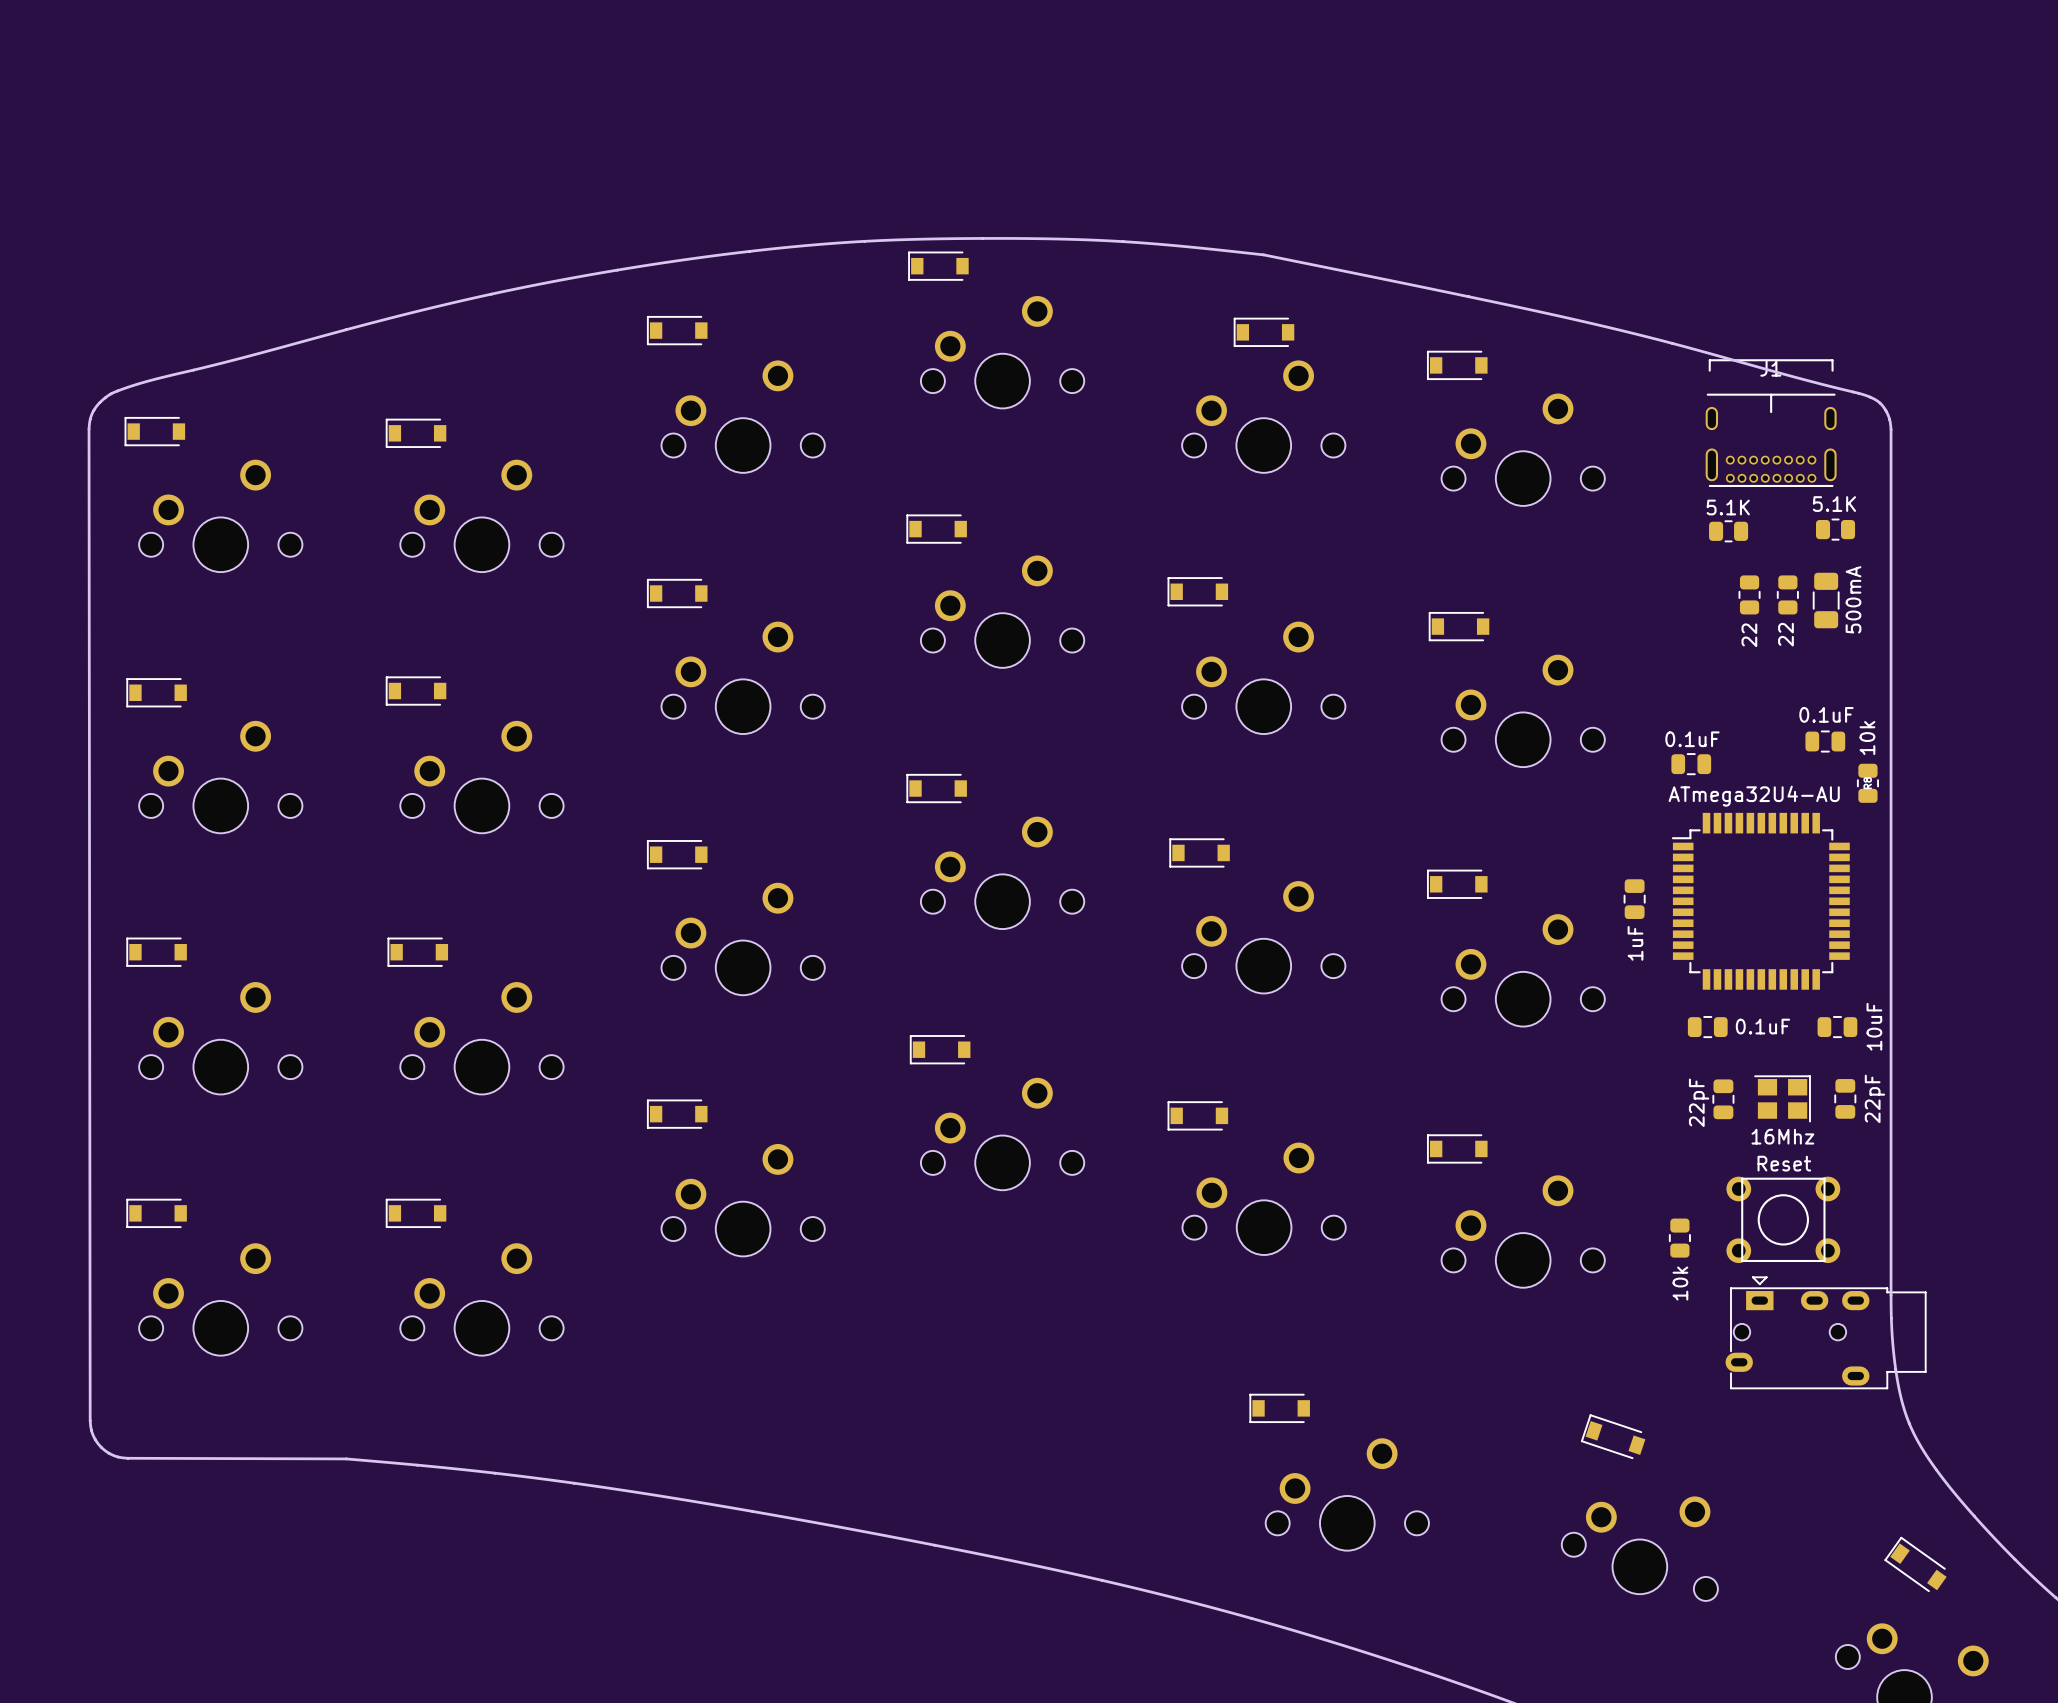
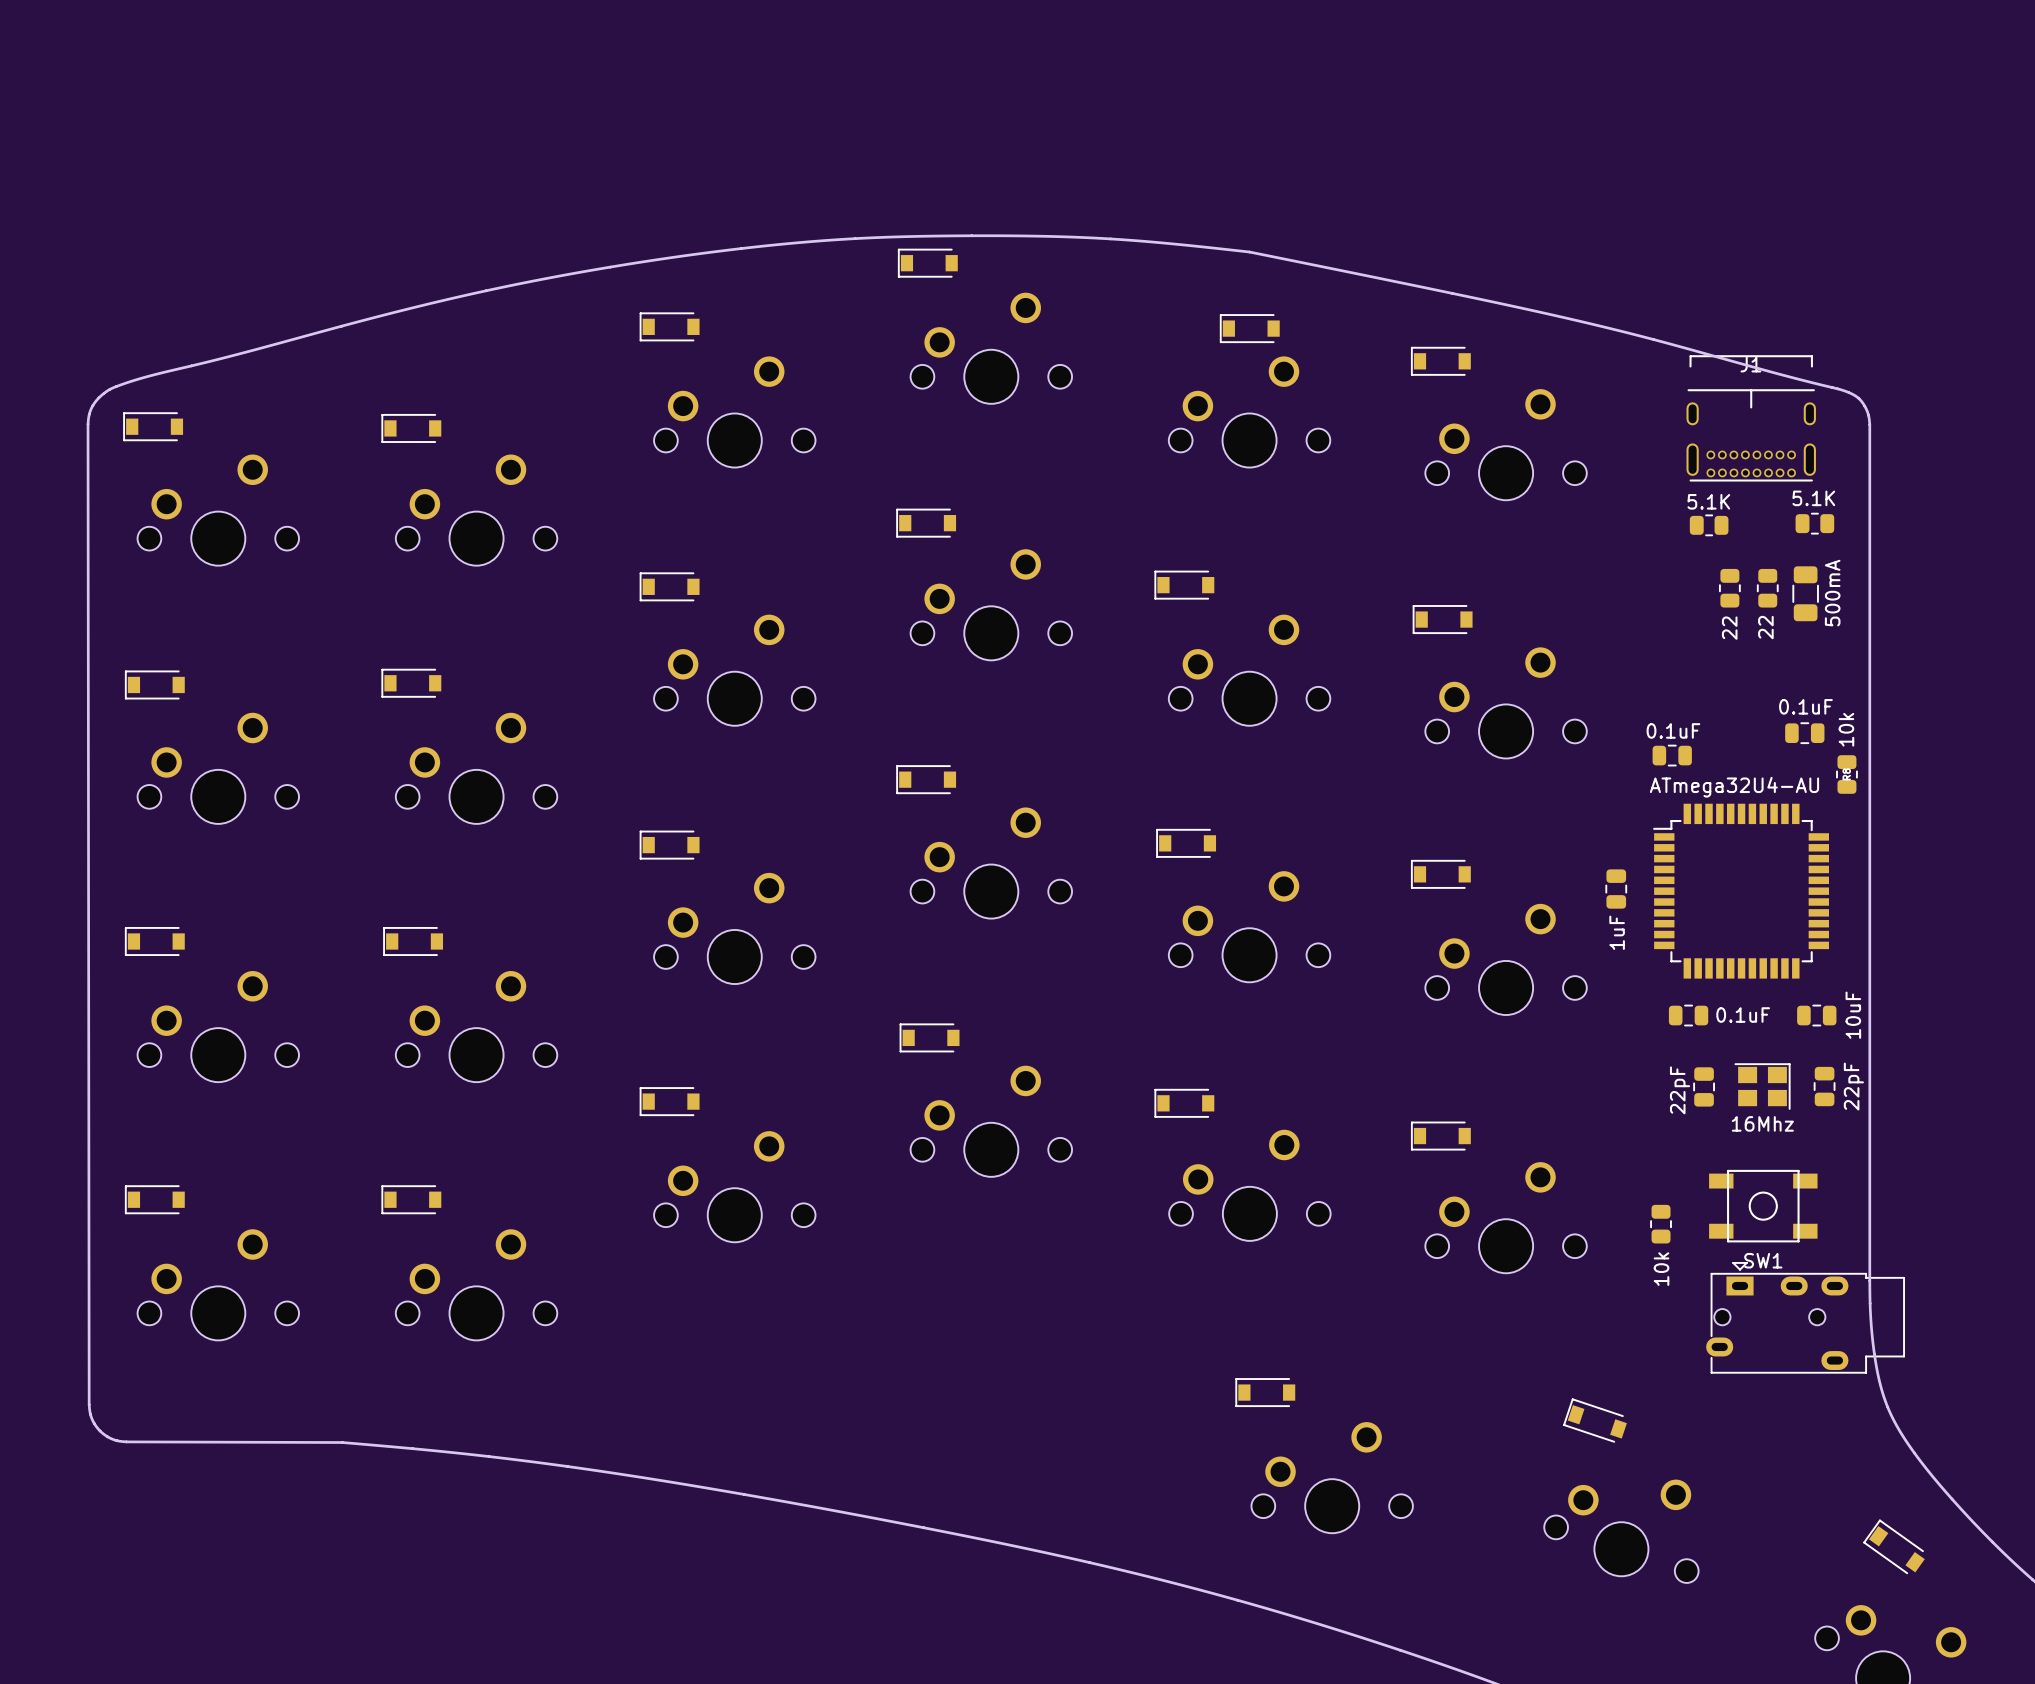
part: Reset (1783, 1219) -> none
SW1: none -> (1763, 1206)

